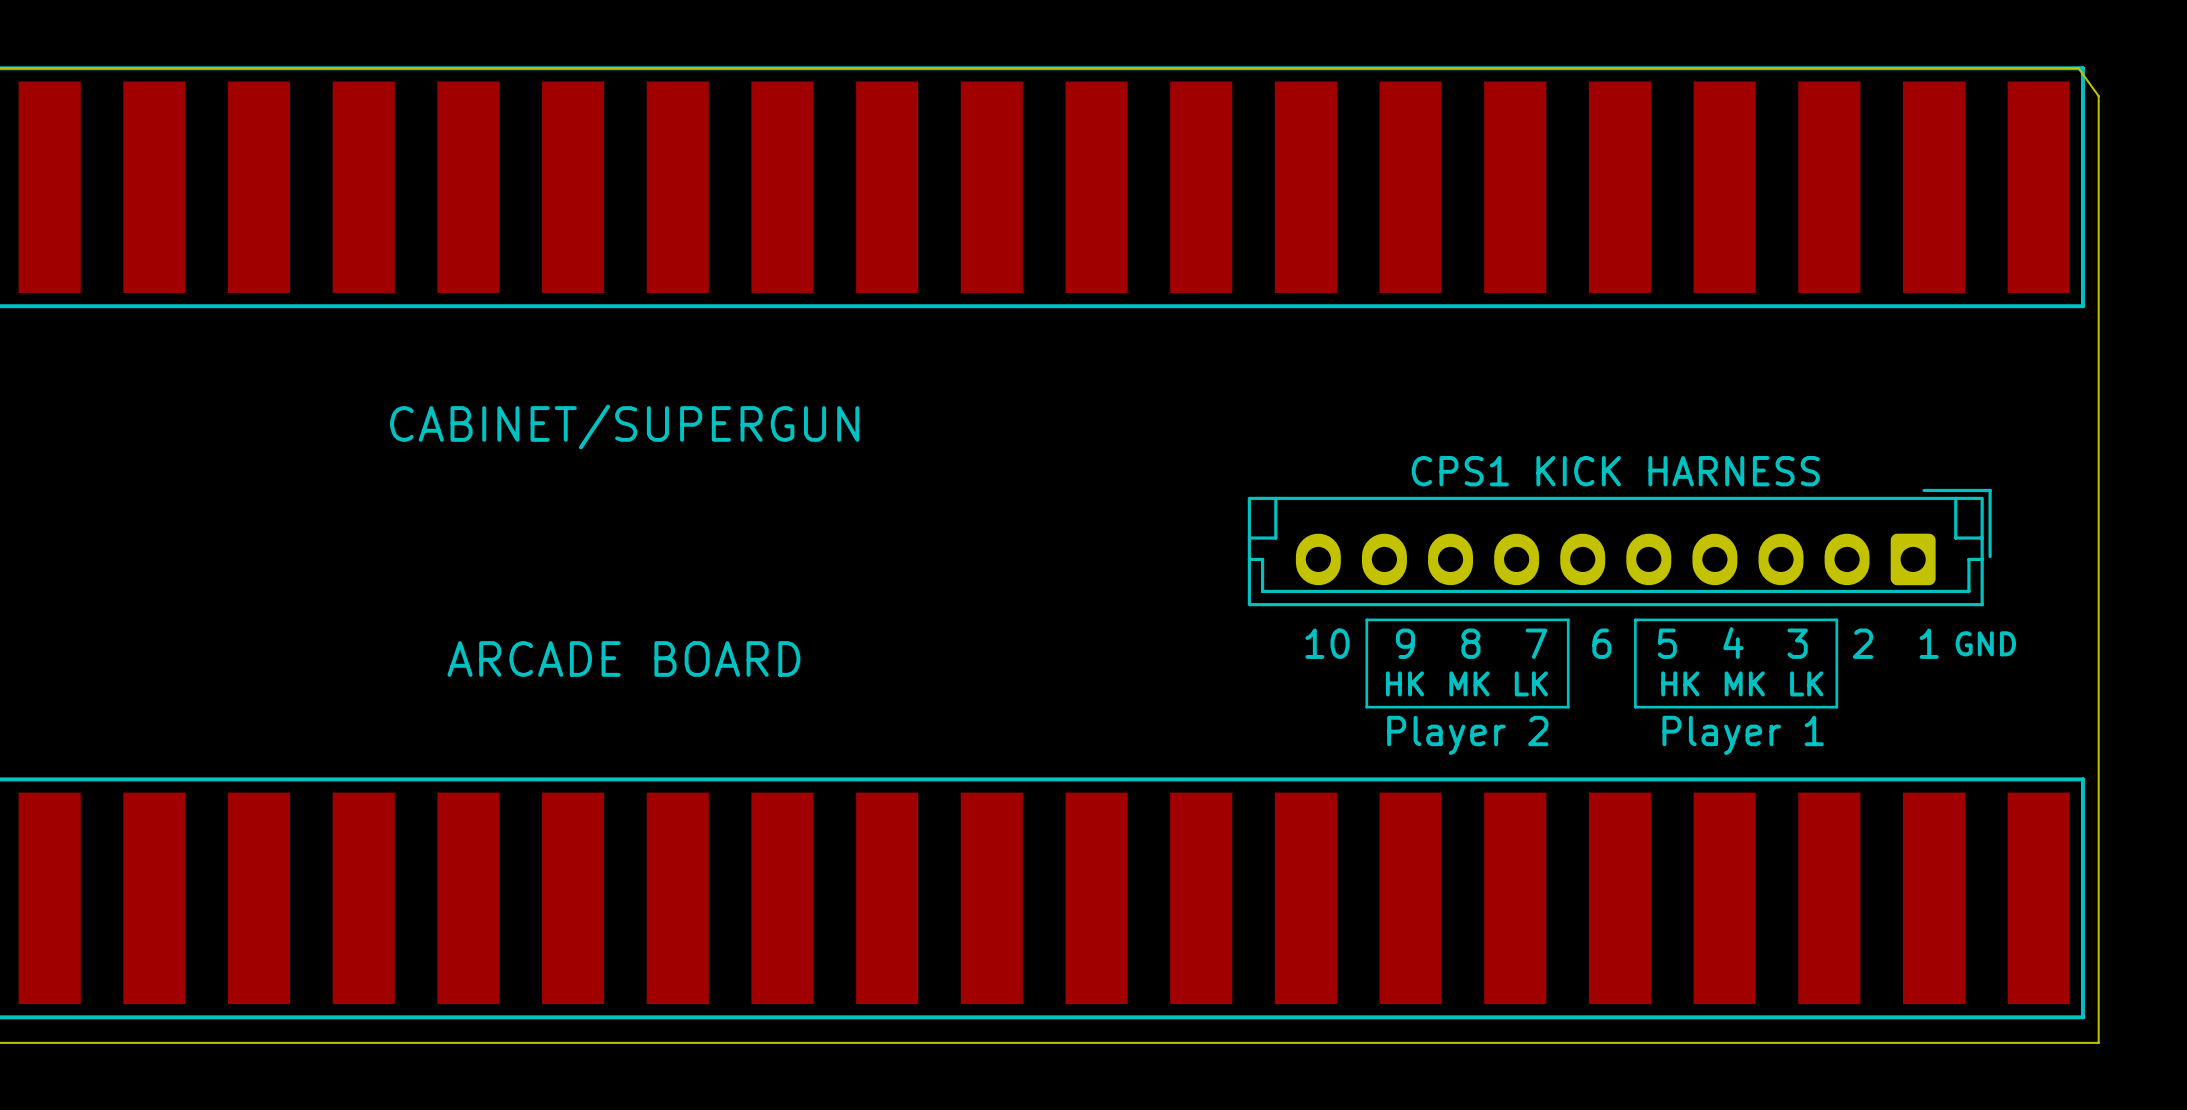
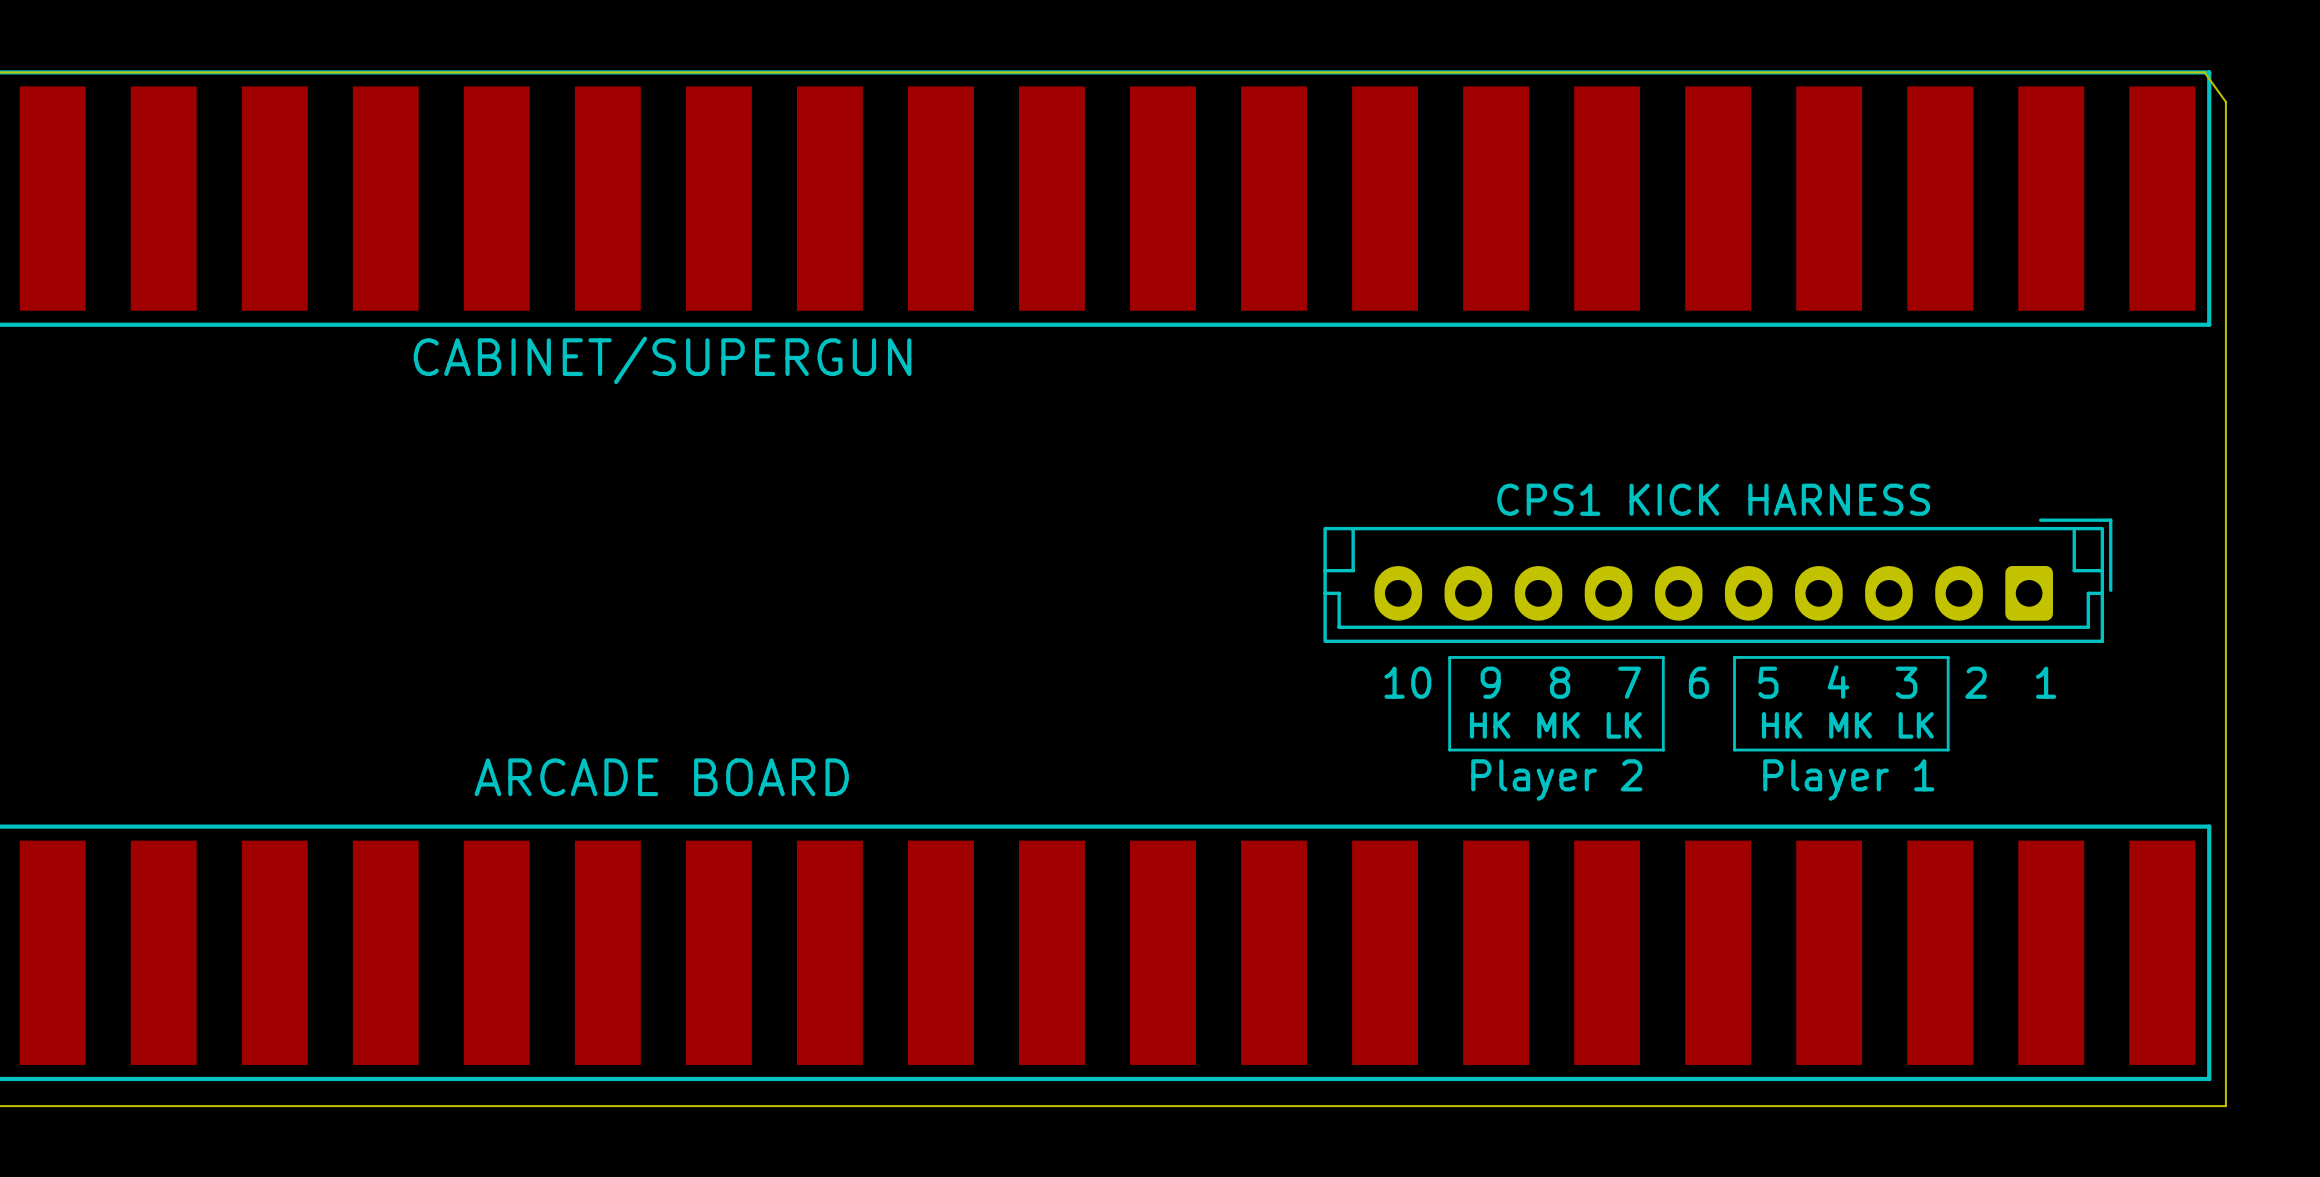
CABINET/SUPERGUN name position: CABINET/SUPERGUN (624, 426) -> CABINET/SUPERGUN (662, 360)
text: GND (1985, 643) -> none
ARCADE BOARD name position: ARCADE BOARD (623, 658) -> ARCADE BOARD (661, 777)

